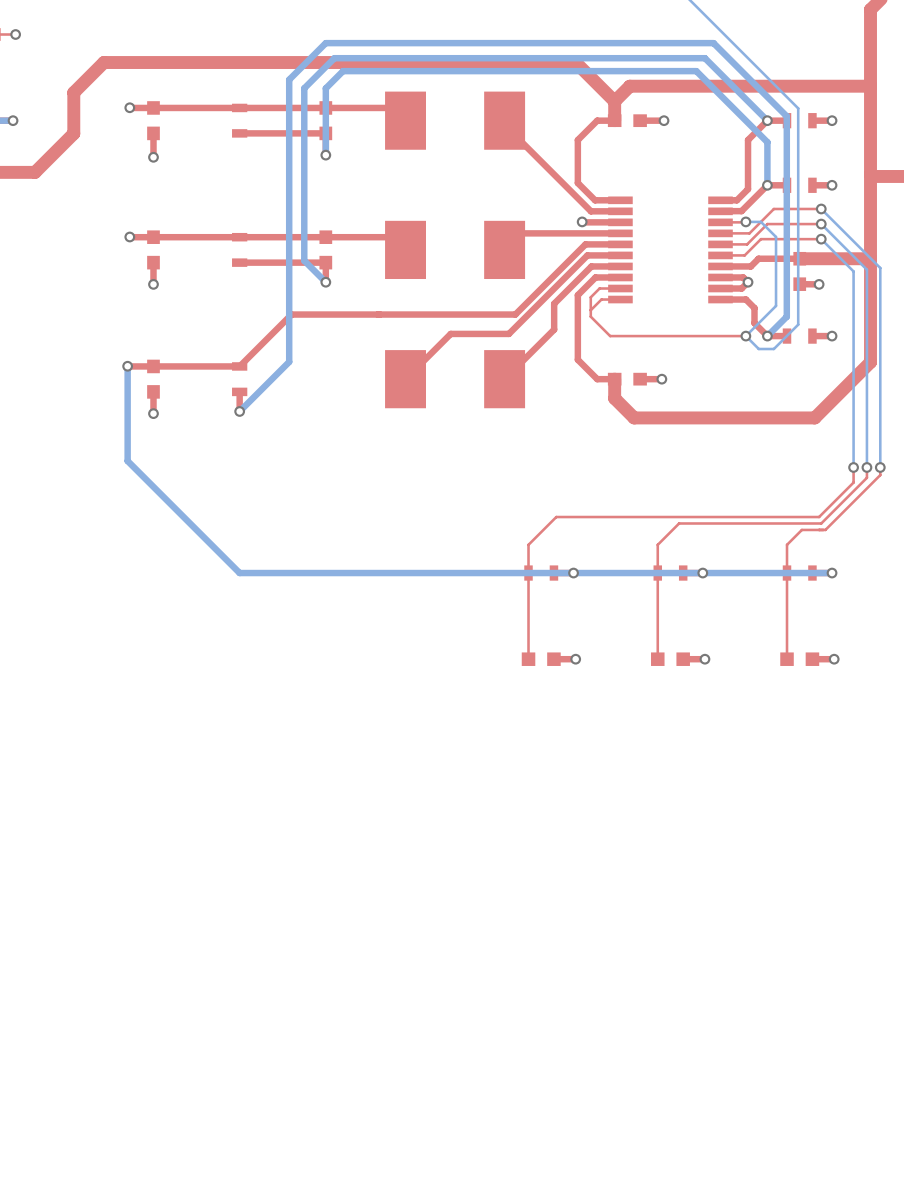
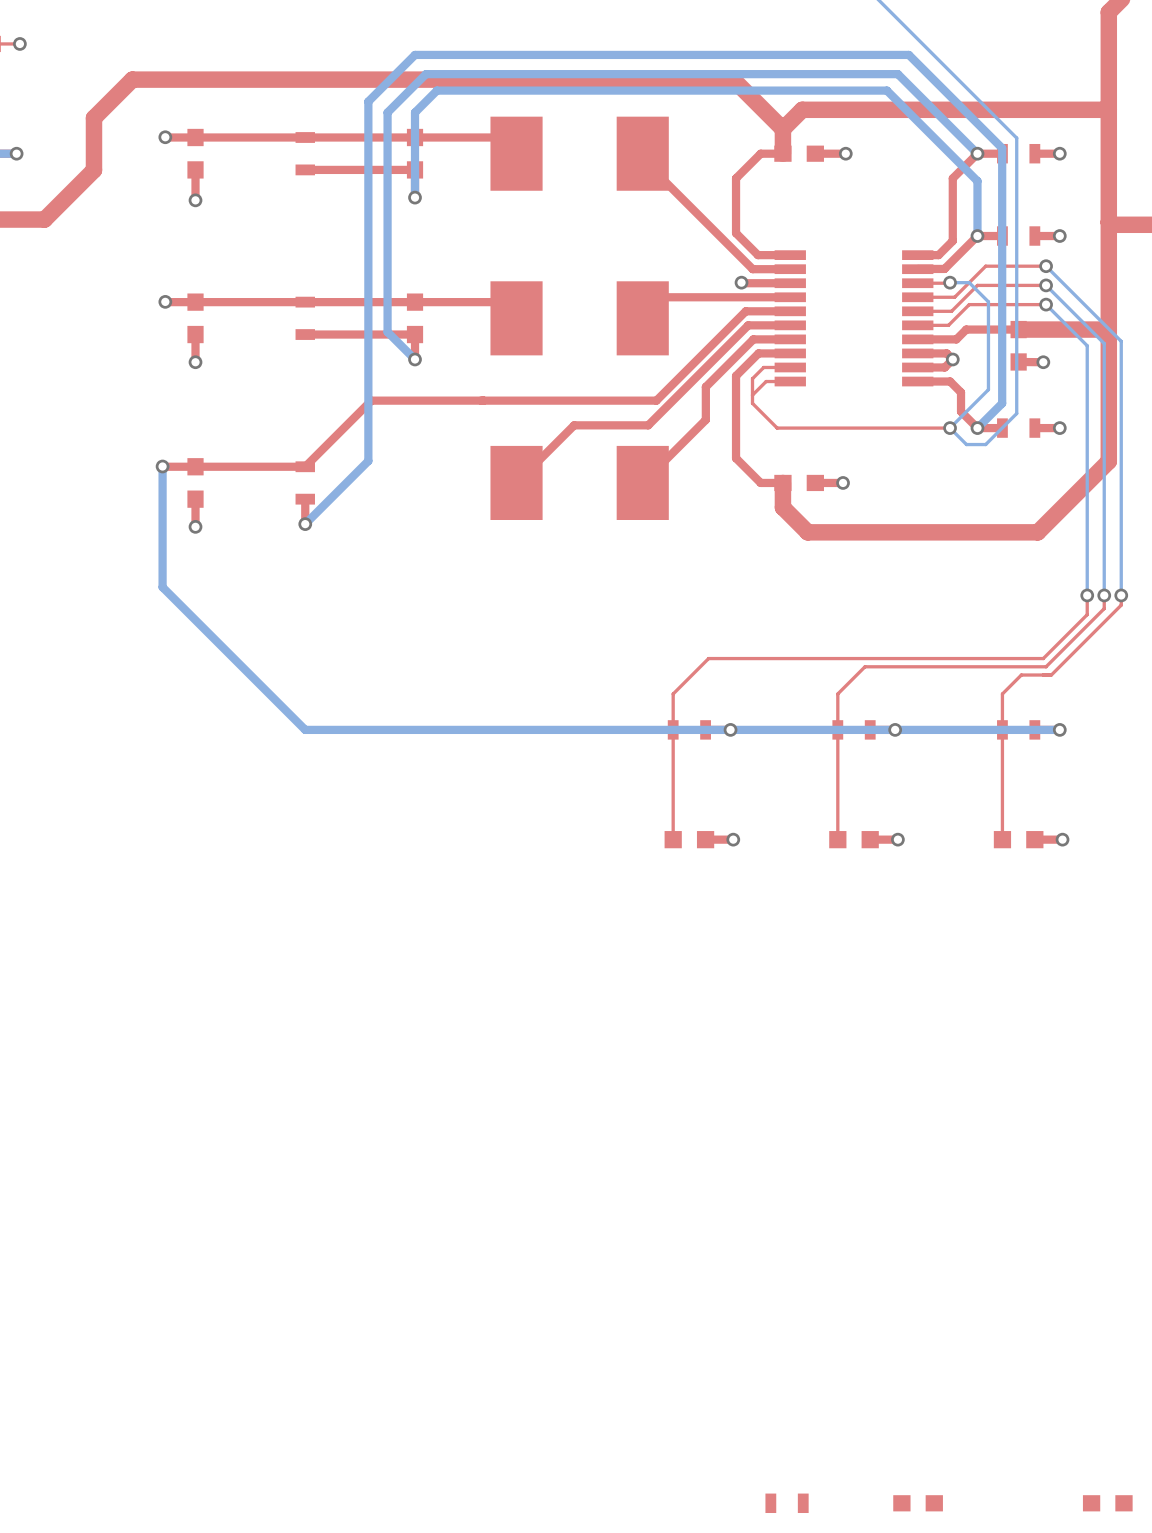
part: none -> (787, 1503)
part: none -> (918, 1503)
part: none -> (1107, 1503)

